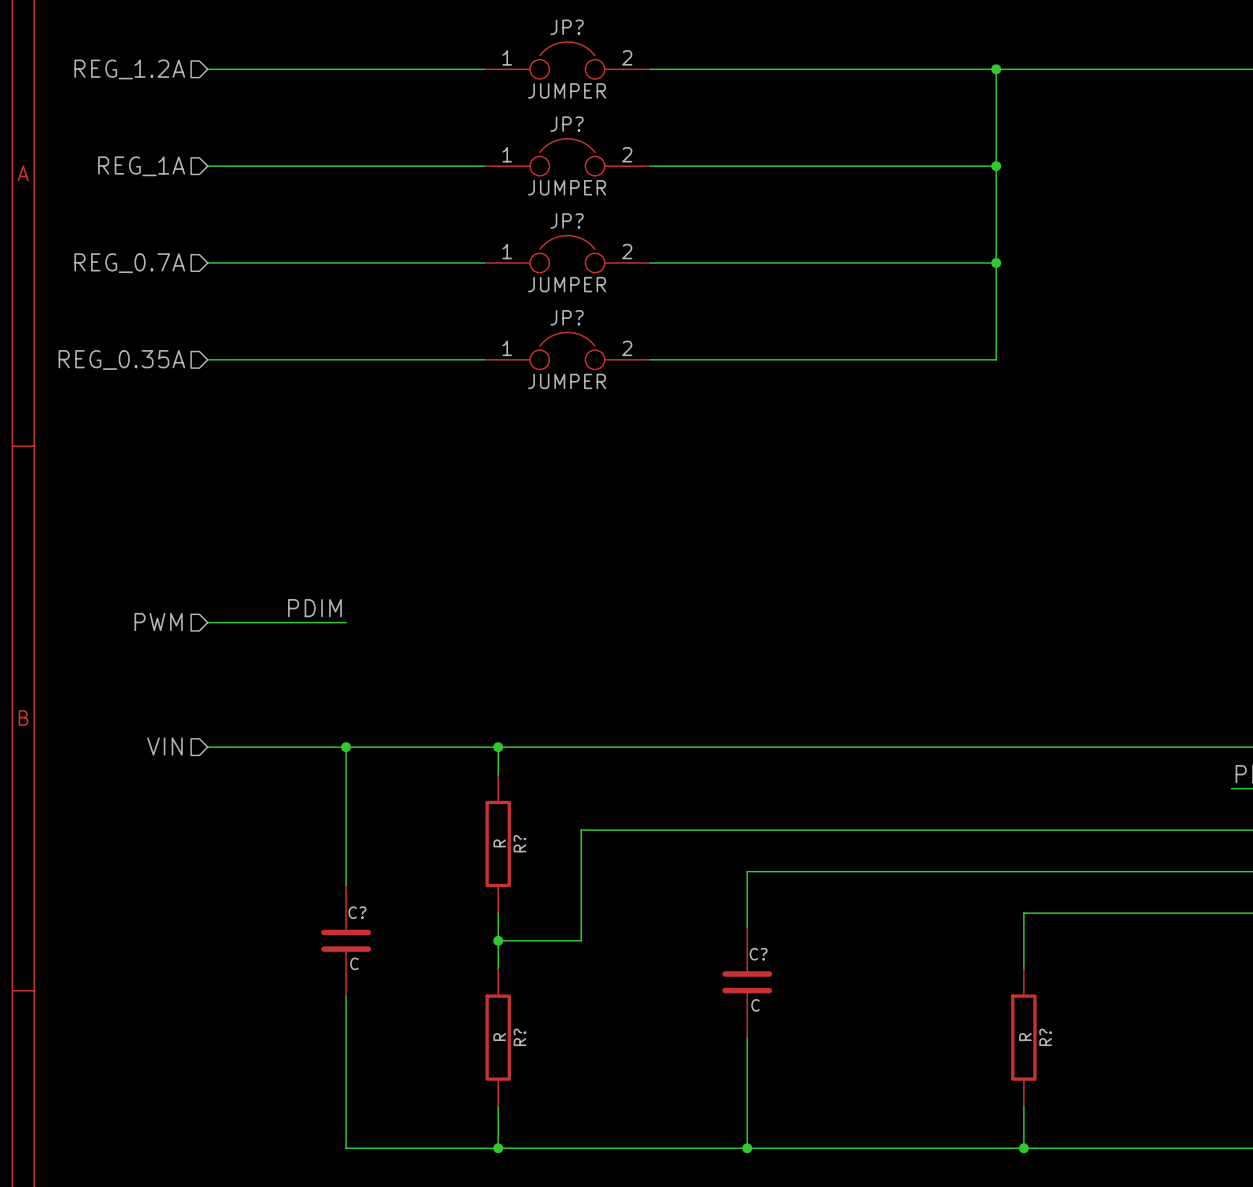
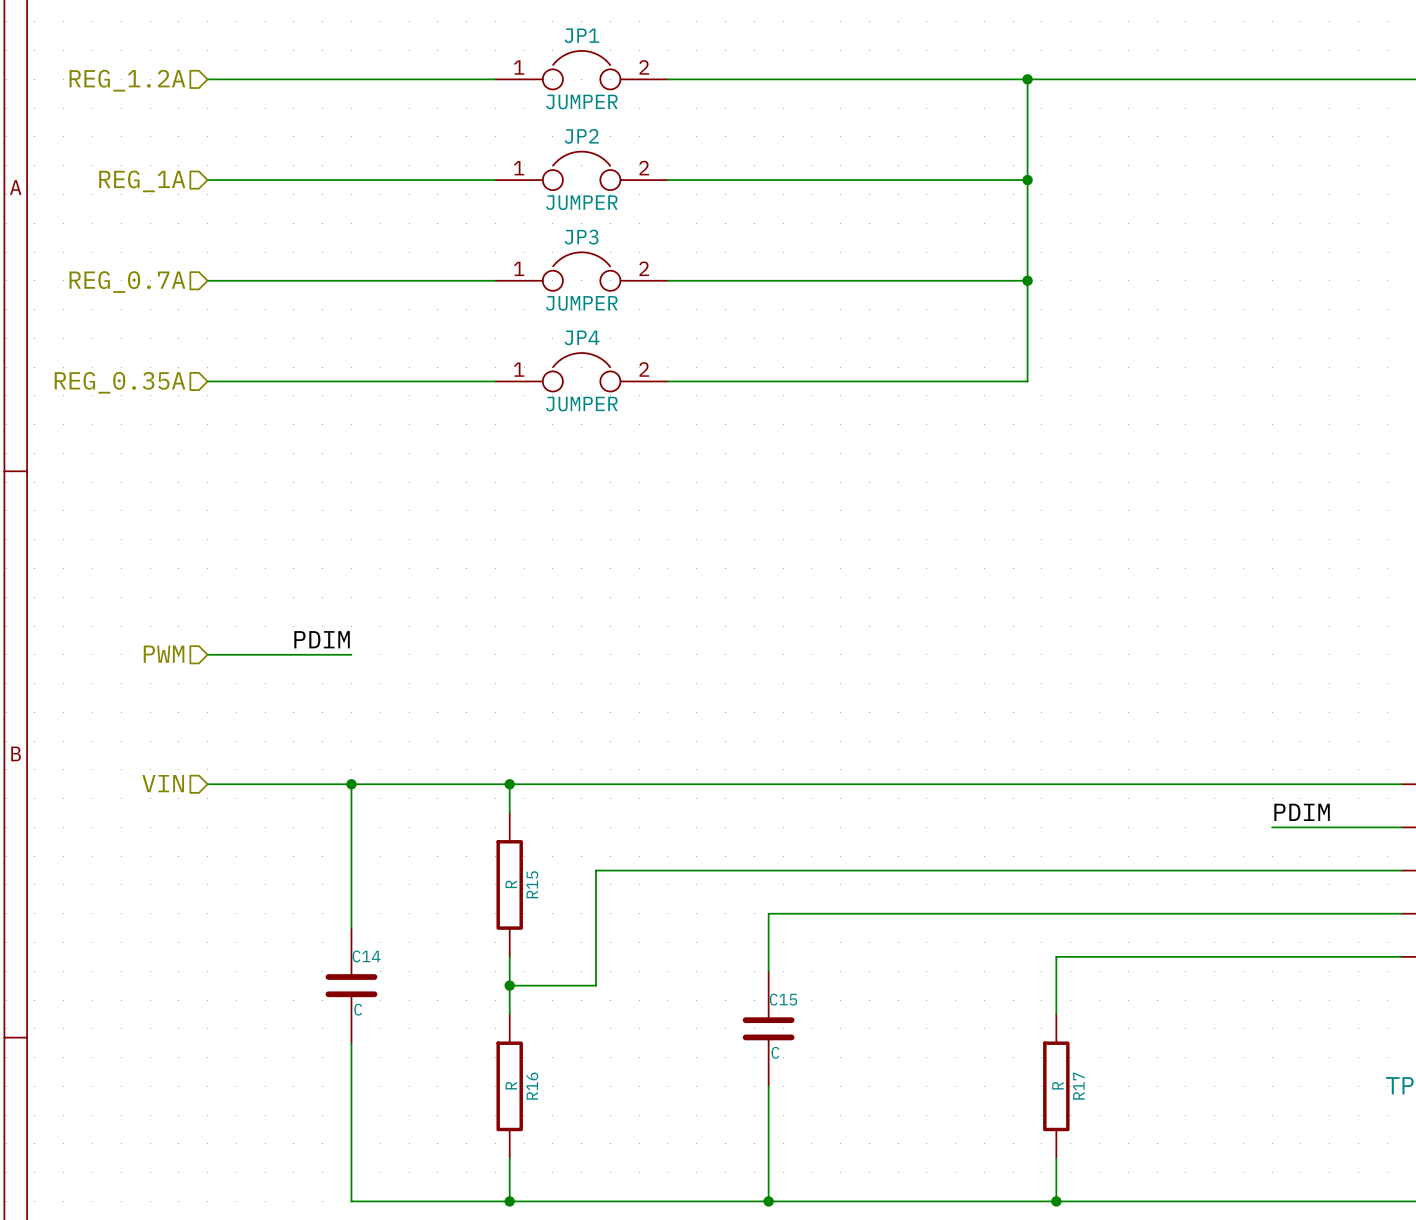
JP? name: JP? (567, 27) -> JP1 (581, 35)
JP? name: JP? (567, 124) -> JP2 (581, 136)
JP? name: JP? (567, 220) -> JP3 (581, 237)
JP? name: JP? (567, 317) -> JP4 (582, 337)
R? name: R? (519, 843) -> R15 (532, 884)
C? name: C? (357, 912) -> C14 (366, 956)
C? name: C? (758, 954) -> C15 (783, 999)
R? name: R? (519, 1037) -> R16 (532, 1086)
R? name: R? (1045, 1037) -> R17 (1078, 1086)

